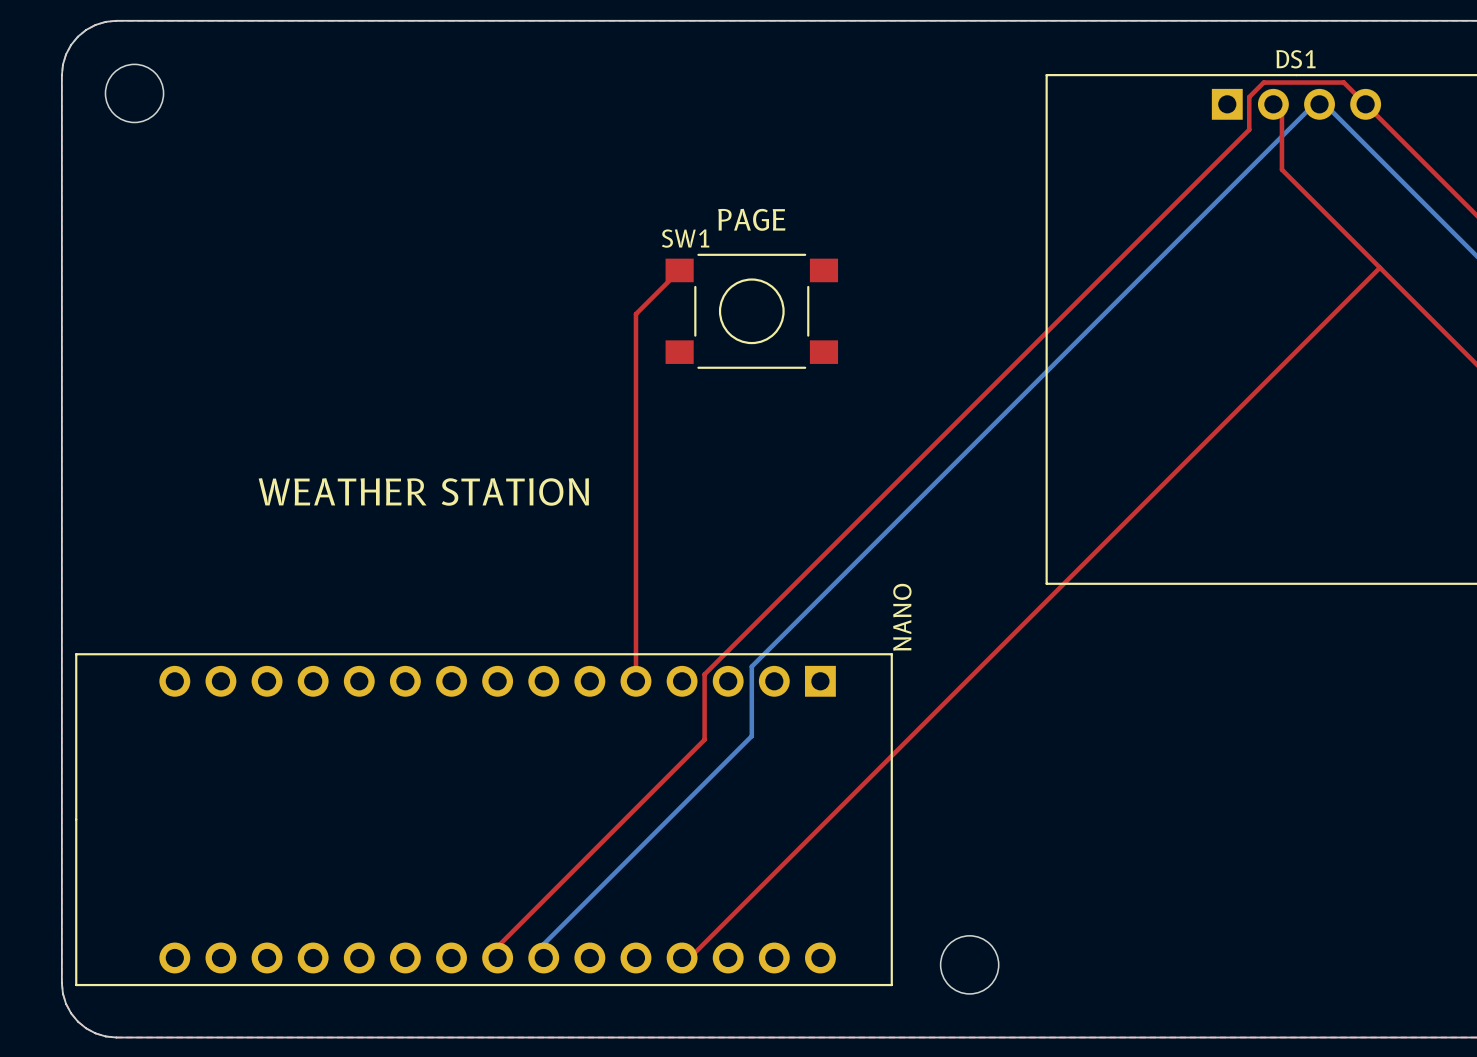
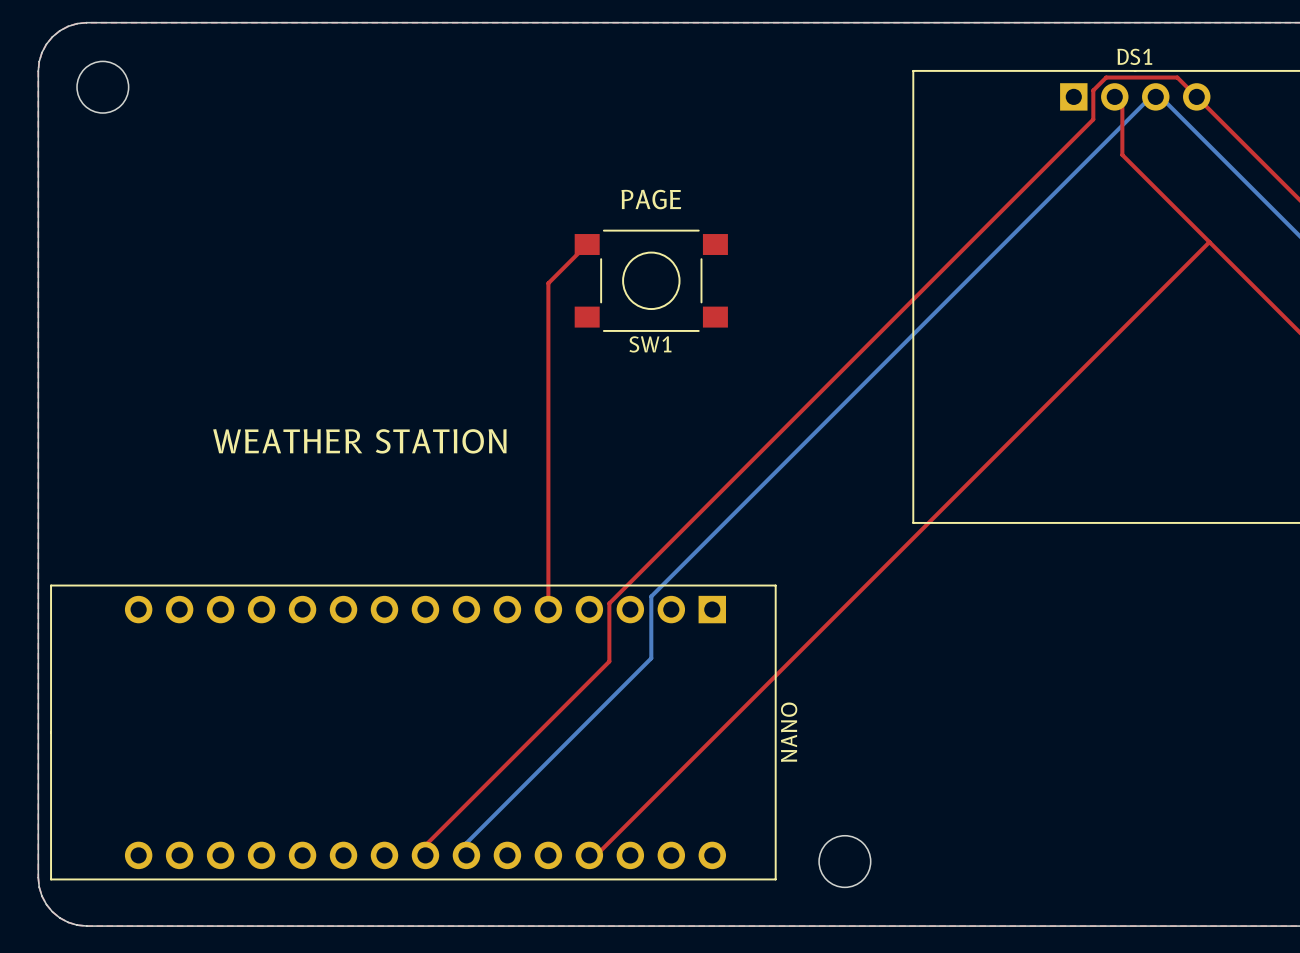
SW1 name position: SW1 (685, 238) -> SW1 (650, 344)
NANO name position: NANO (902, 617) -> NANO (789, 732)

